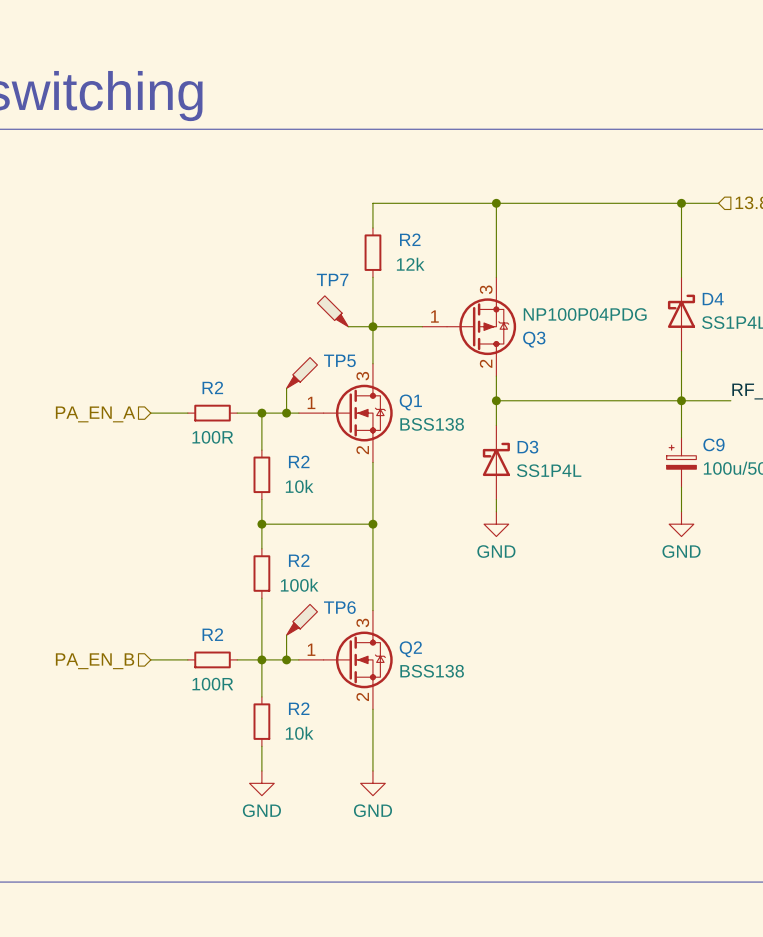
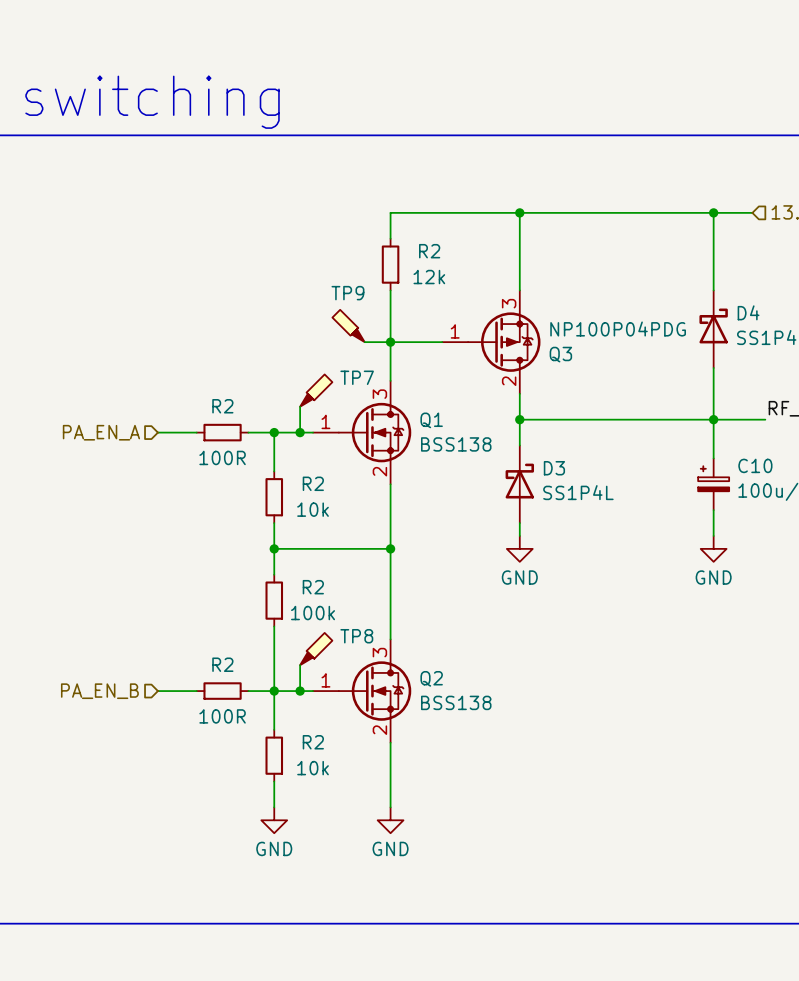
TP7 name: TP7 (332, 279) -> TP9 (347, 293)
TP5 name: TP5 (339, 360) -> TP7 (357, 377)
C9 name: C9 (713, 444) -> C10 (755, 465)
TP6 name: TP6 (339, 607) -> TP8 (356, 636)

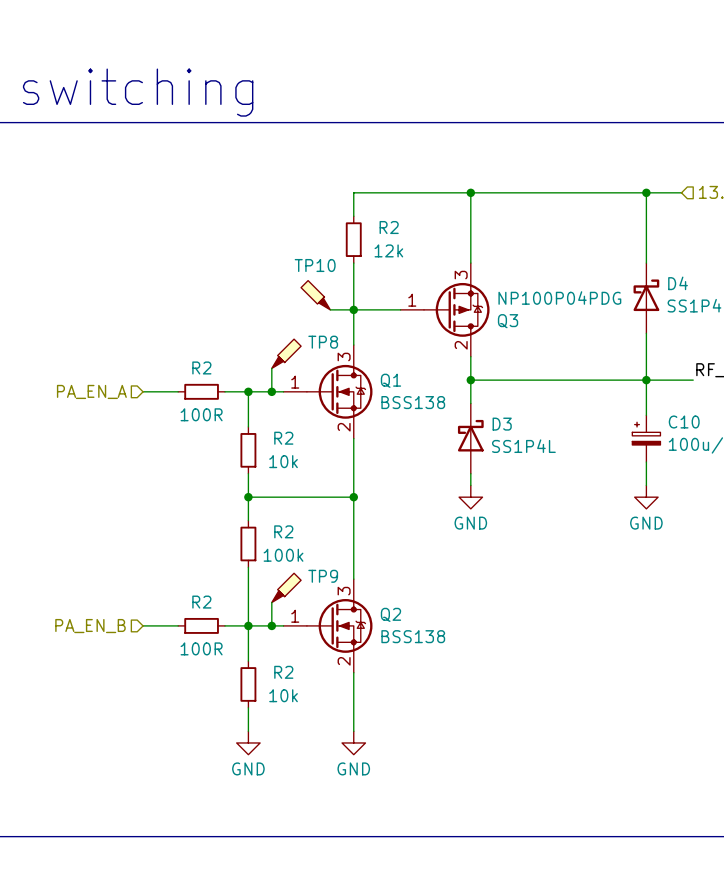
TP9 name: TP9 (347, 293) -> TP10 (315, 265)
TP7 name: TP7 (357, 377) -> TP8 (323, 342)
TP8 name: TP8 (356, 636) -> TP9 (323, 576)

